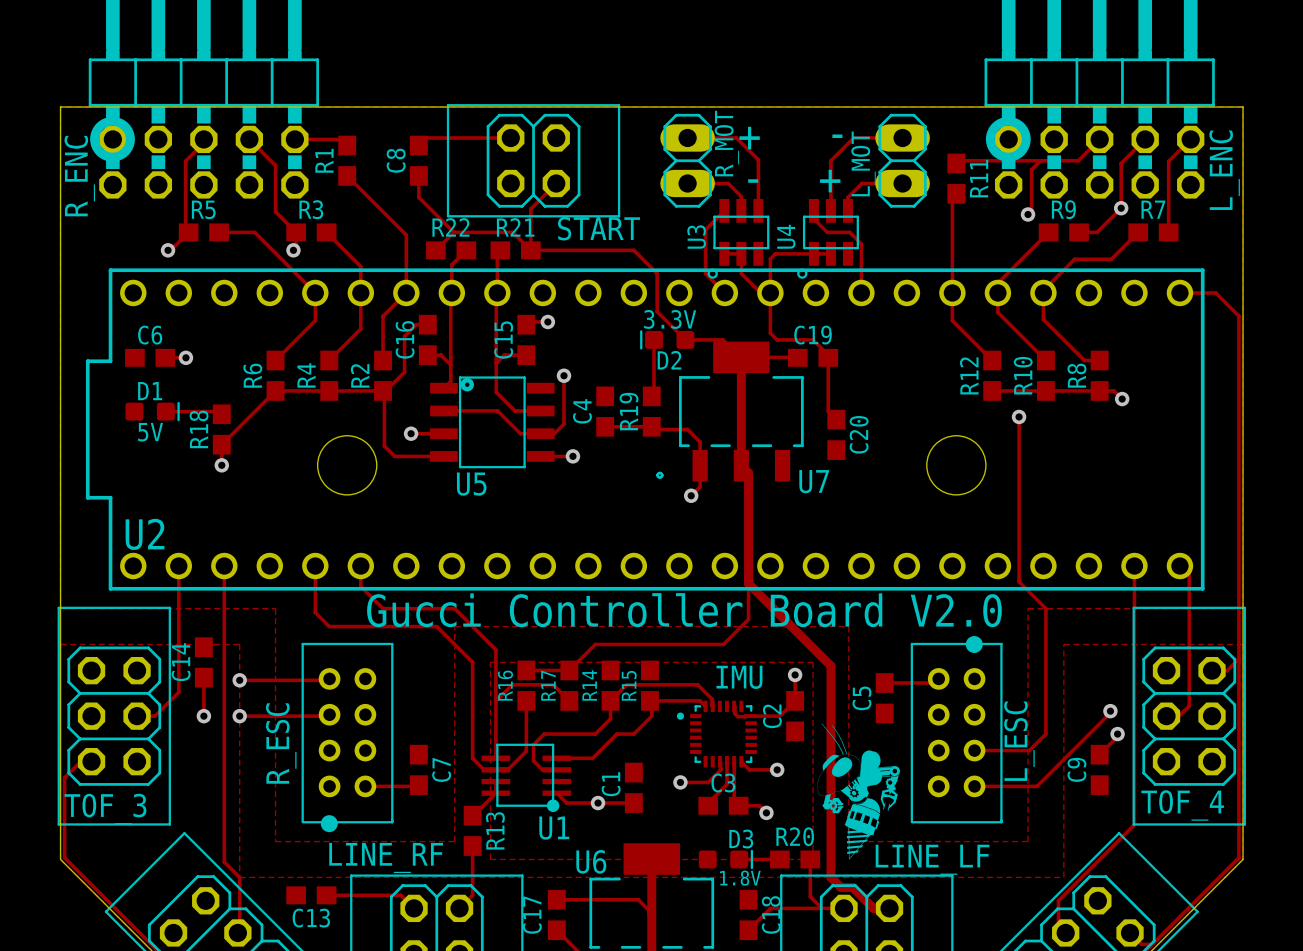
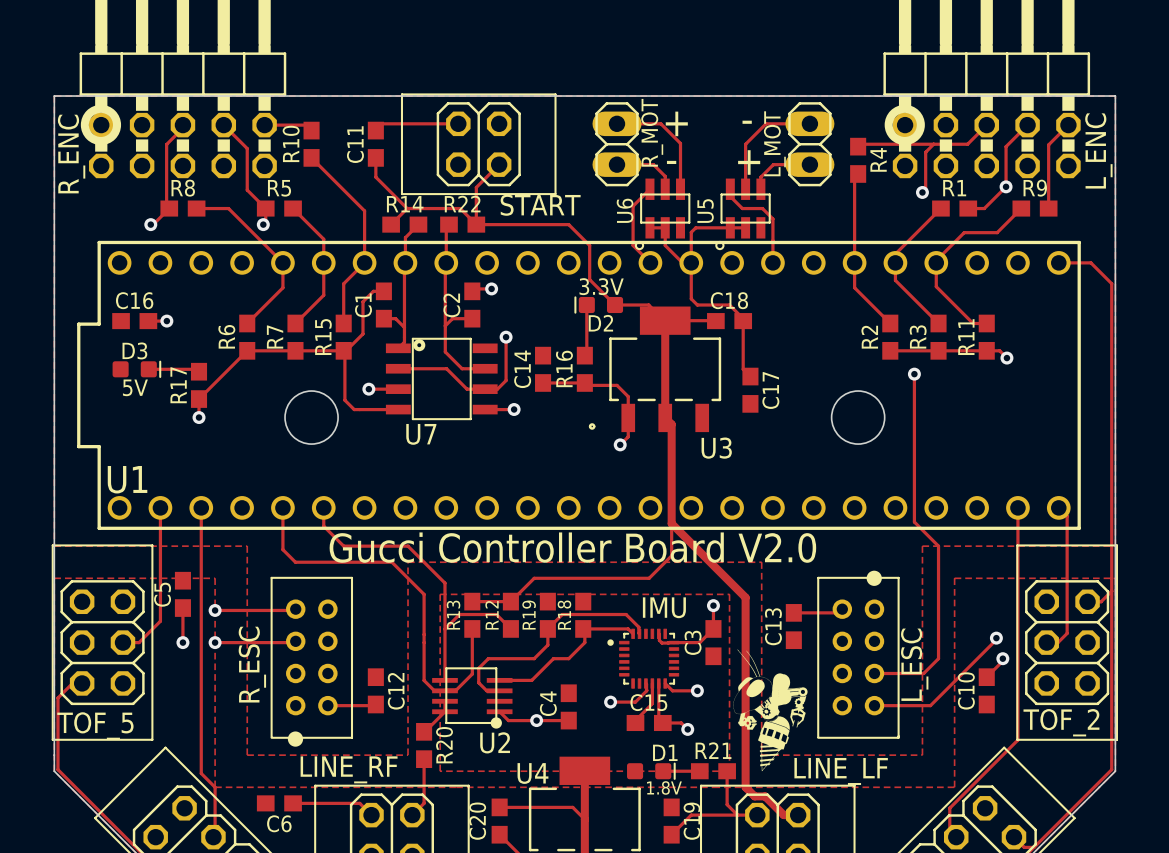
R1 name: R1 (324, 160) -> R10 (291, 143)
C8 name: C8 (396, 160) -> C11 (355, 144)
R11 name: R11 (979, 178) -> R4 (878, 159)
R5 name: R5 (203, 209) -> R8 (183, 188)
R3 name: R3 (311, 209) -> R5 (279, 188)
R9 name: R9 (1063, 209) -> R1 (954, 188)
R7 name: R7 (1153, 209) -> R9 (1035, 188)
R22 name: R22 (450, 227) -> R14 (405, 204)
R21 name: R21 (515, 227) -> R22 (462, 204)
U4 name: U4 (786, 236) -> U5 (705, 211)
U3 name: U3 (696, 237) -> U6 (625, 210)
C6 name: C6 (150, 335) -> C16 (134, 300)
C19 name: C19 (813, 335) -> C18 (729, 300)
C16 name: C16 (405, 339) -> C1 (363, 305)
C15 name: C15 (503, 340) -> C2 (451, 305)
R4 name: R4 (306, 375) -> R7 (275, 337)
R2 name: R2 (360, 375) -> R15 (323, 337)
R12 name: R12 (969, 375) -> R2 (869, 337)
R10 name: R10 (1023, 375) -> R3 (918, 336)
R8 name: R8 (1076, 375) -> R11 (966, 337)
D1 name: D1 (150, 391) -> D3 (134, 350)
C4 name: C4 (582, 411) -> C14 (522, 369)
R19 name: R19 (629, 411) -> R16 (564, 368)
R18 name: R18 (199, 429) -> R17 (178, 385)
C20 name: C20 (859, 434) -> C17 (770, 390)
U7 name: U7 (814, 481) -> U3 (716, 448)
U5 name: U5 (471, 484) -> U7 (421, 434)
U2 name: U2 (145, 534) -> U1 (127, 479)
C14 name: C14 (181, 662) -> C5 (162, 594)
R16 name: R16 (505, 685) -> R13 (453, 615)
R17 name: R17 (548, 685) -> R12 (492, 615)
R14 name: R14 (589, 685) -> R19 (529, 615)
R15 name: R15 (629, 685) -> R18 (564, 615)
C5 name: C5 (861, 698) -> C13 (773, 626)
C2 name: C2 (772, 716) -> C3 (693, 642)
C7 name: C7 (441, 769) -> C12 (396, 691)
C9 name: C9 (1076, 769) -> C10 (966, 690)
C3 name: C3 (723, 782) -> C15 (648, 702)
C1 name: C1 (611, 784) -> C4 (548, 703)
TOF_4 name: TOF_4 (1182, 805) -> TOF_2 (1061, 722)
TOF_3 name: TOF_3 (105, 809) -> TOF_5 (95, 725)
U1 name: U1 (554, 828) -> U2 (495, 742)
R13 name: R13 (495, 830) -> R20 (444, 745)
R20 name: R20 (795, 836) -> R21 (713, 750)
D3 name: D3 (741, 839) -> D1 (665, 752)
U6 name: U6 (591, 861) -> U4 (532, 773)
C18 name: C18 (771, 914) -> C19 (692, 821)
C17 name: C17 (532, 915) -> C20 (477, 821)
C13 name: C13 (311, 918) -> C6 (279, 823)

